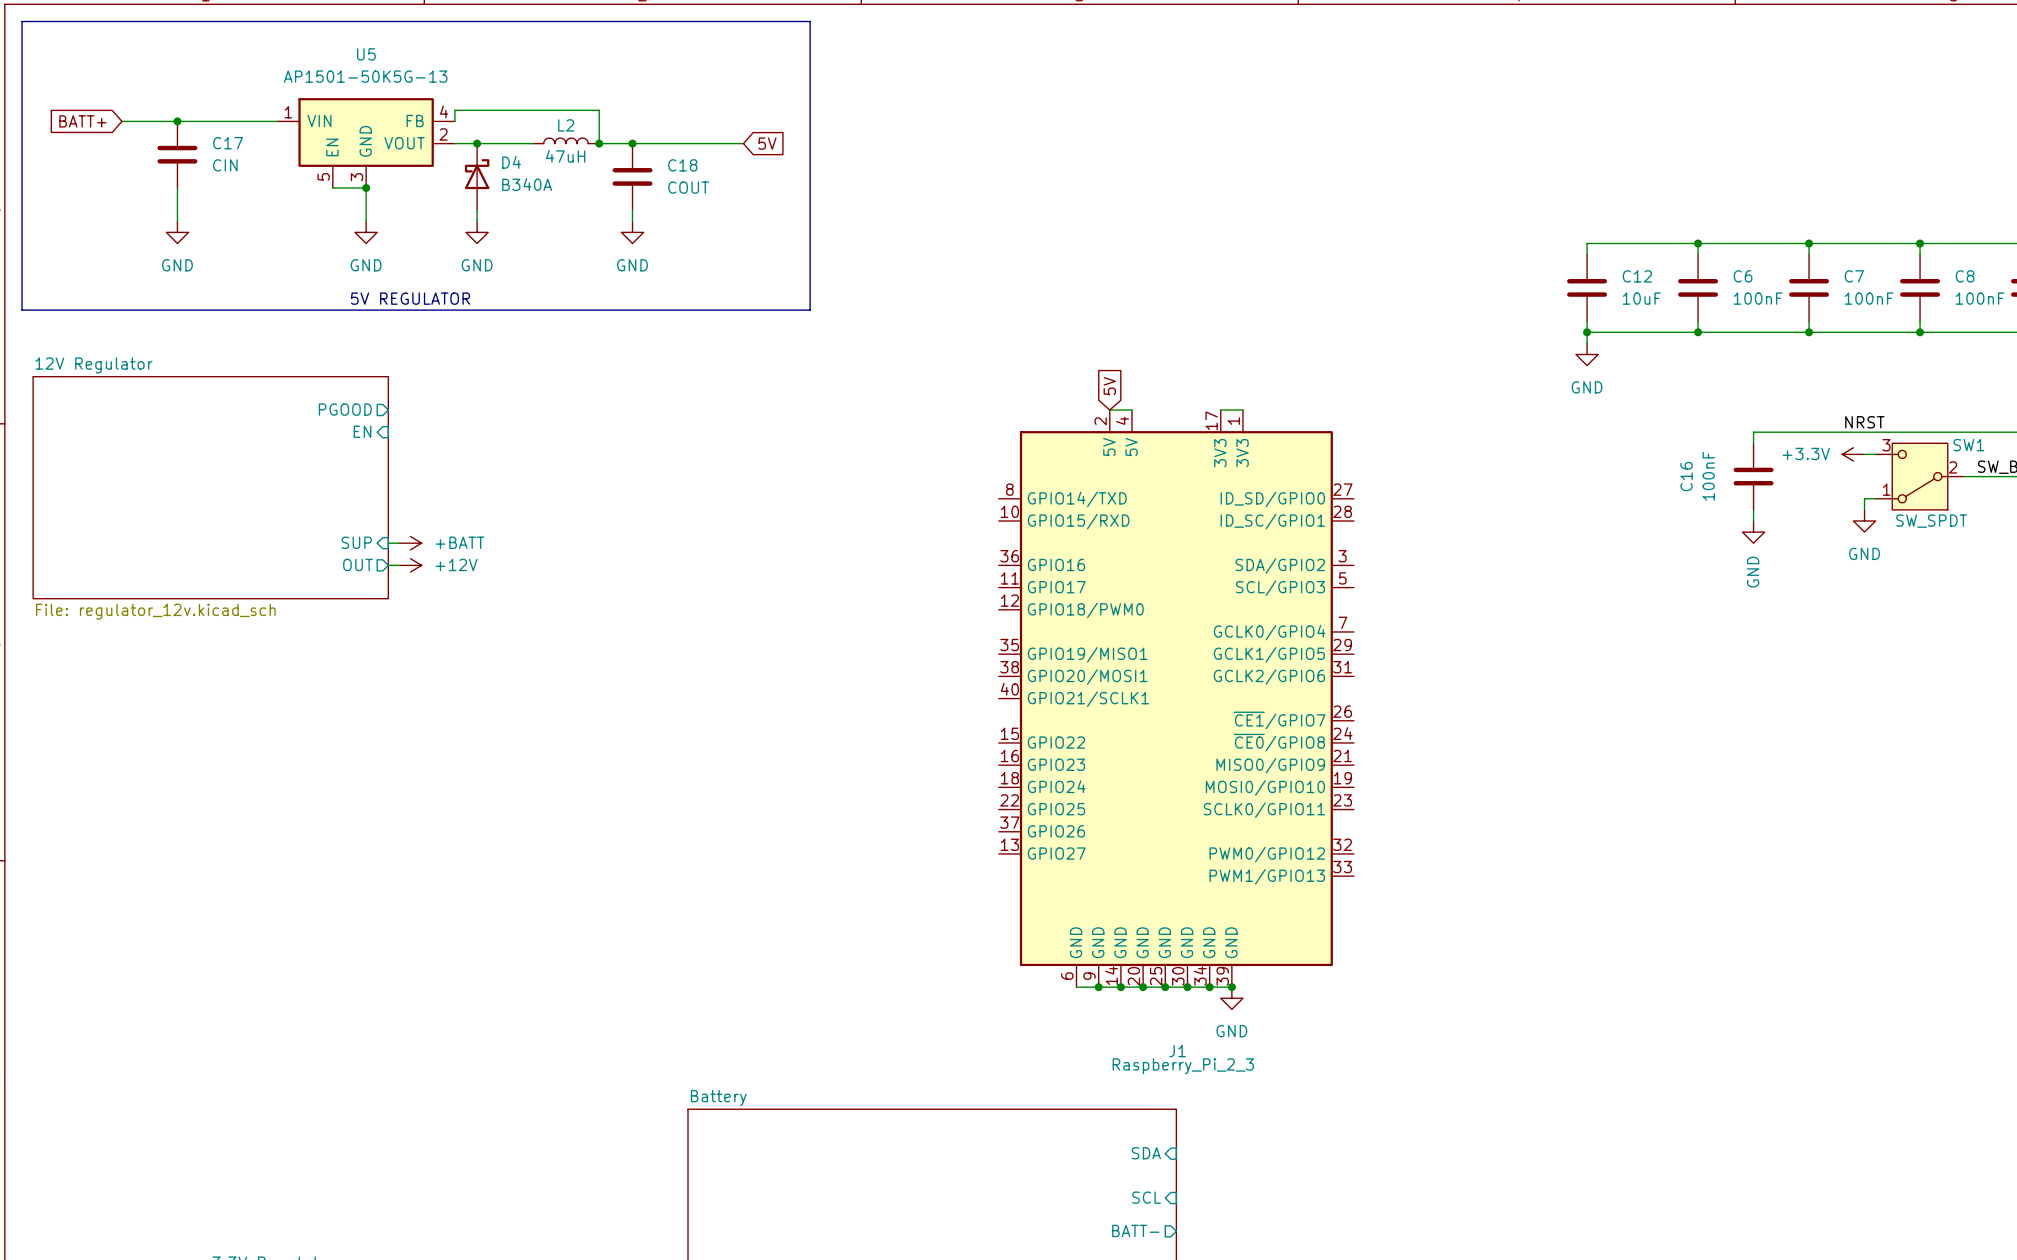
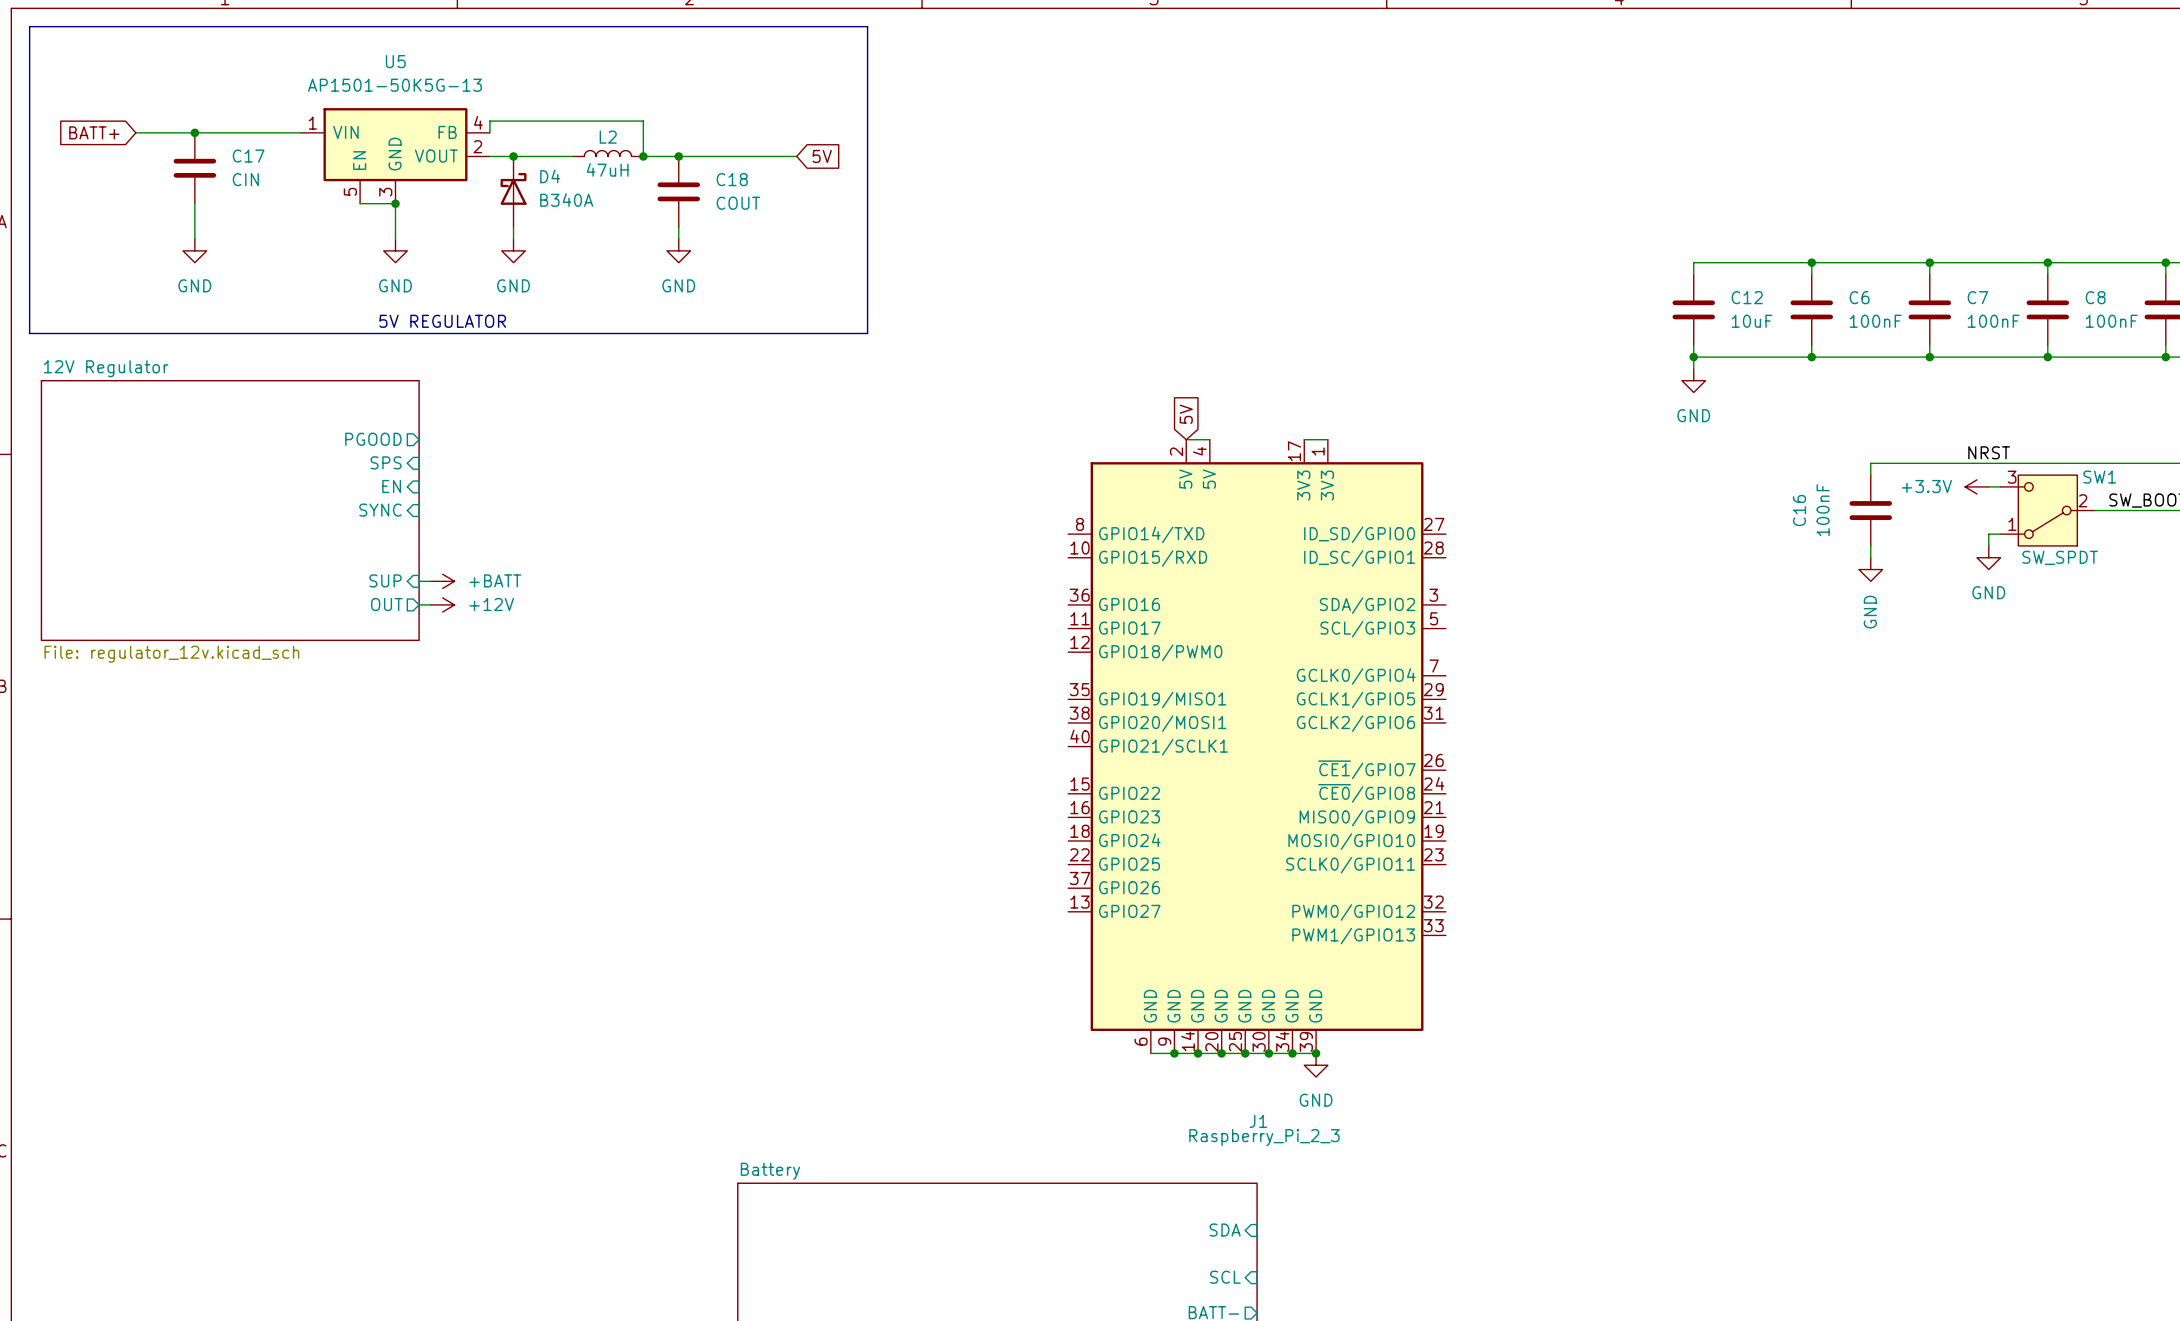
sheet 12V Regulator shape: [32, 376, 389, 600] -> [40, 380, 420, 642]
sheet pin: EN (362, 431) -> SPS (386, 462)
sheet pin: none -> EN (391, 486)
sheet pin: none -> SYNC (380, 510)

